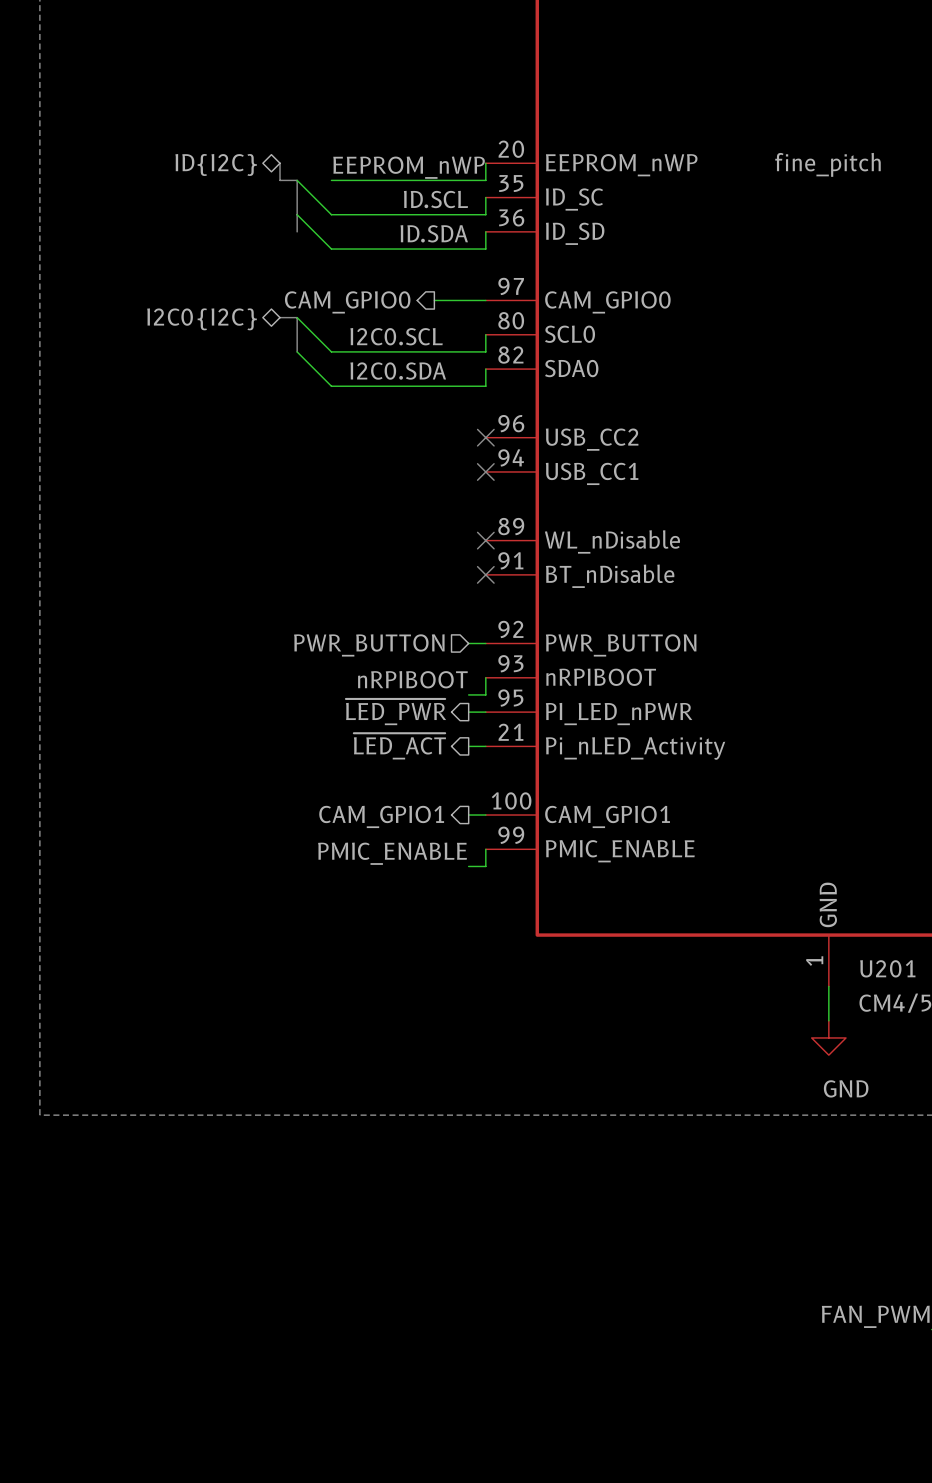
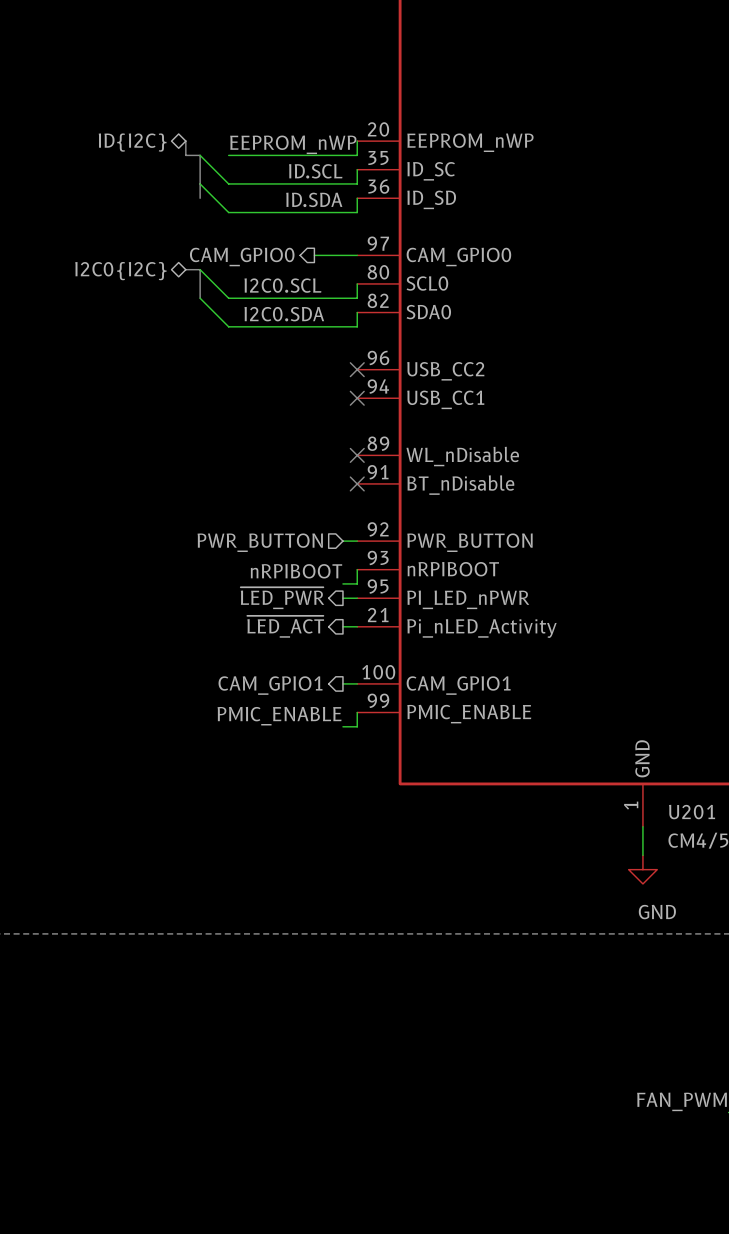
U201 text: fine_pitch (828, 164) -> none

